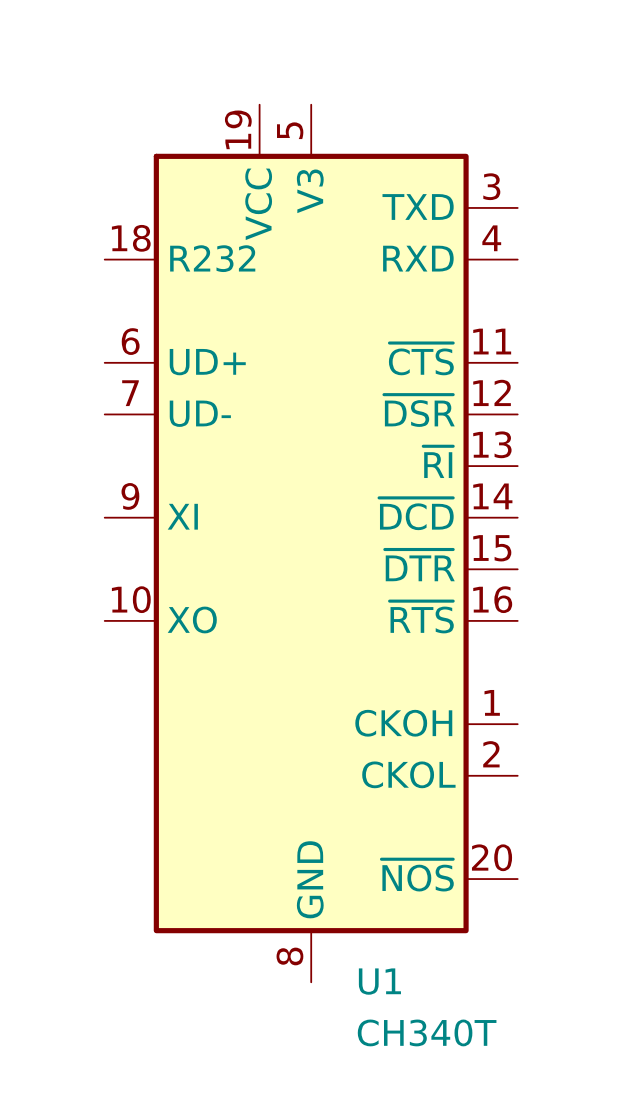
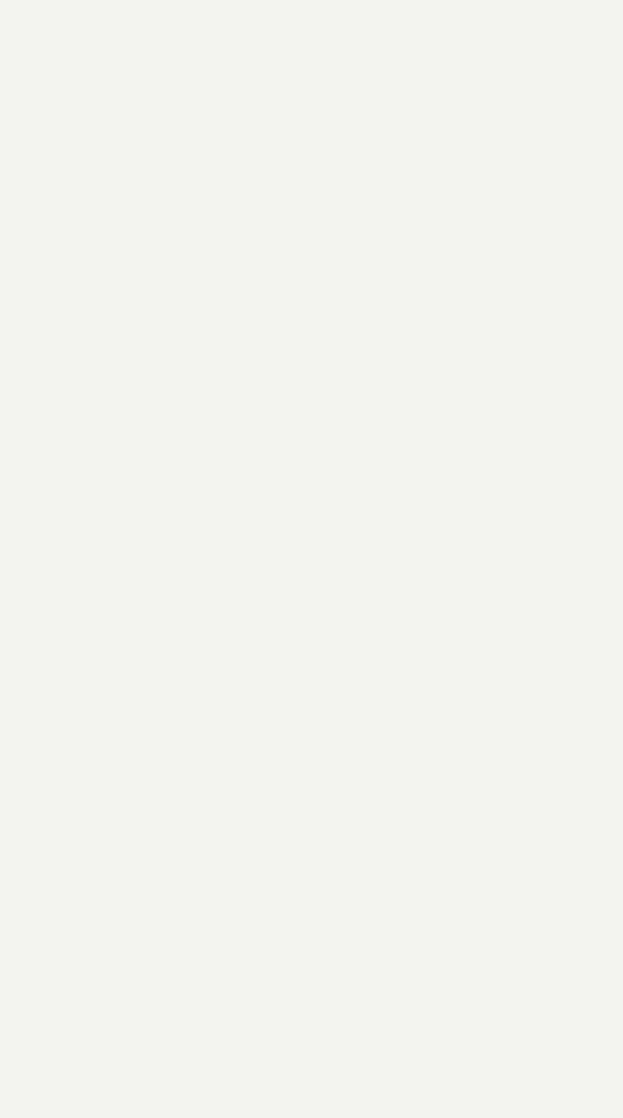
U1: CH340T (311, 543) -> none

